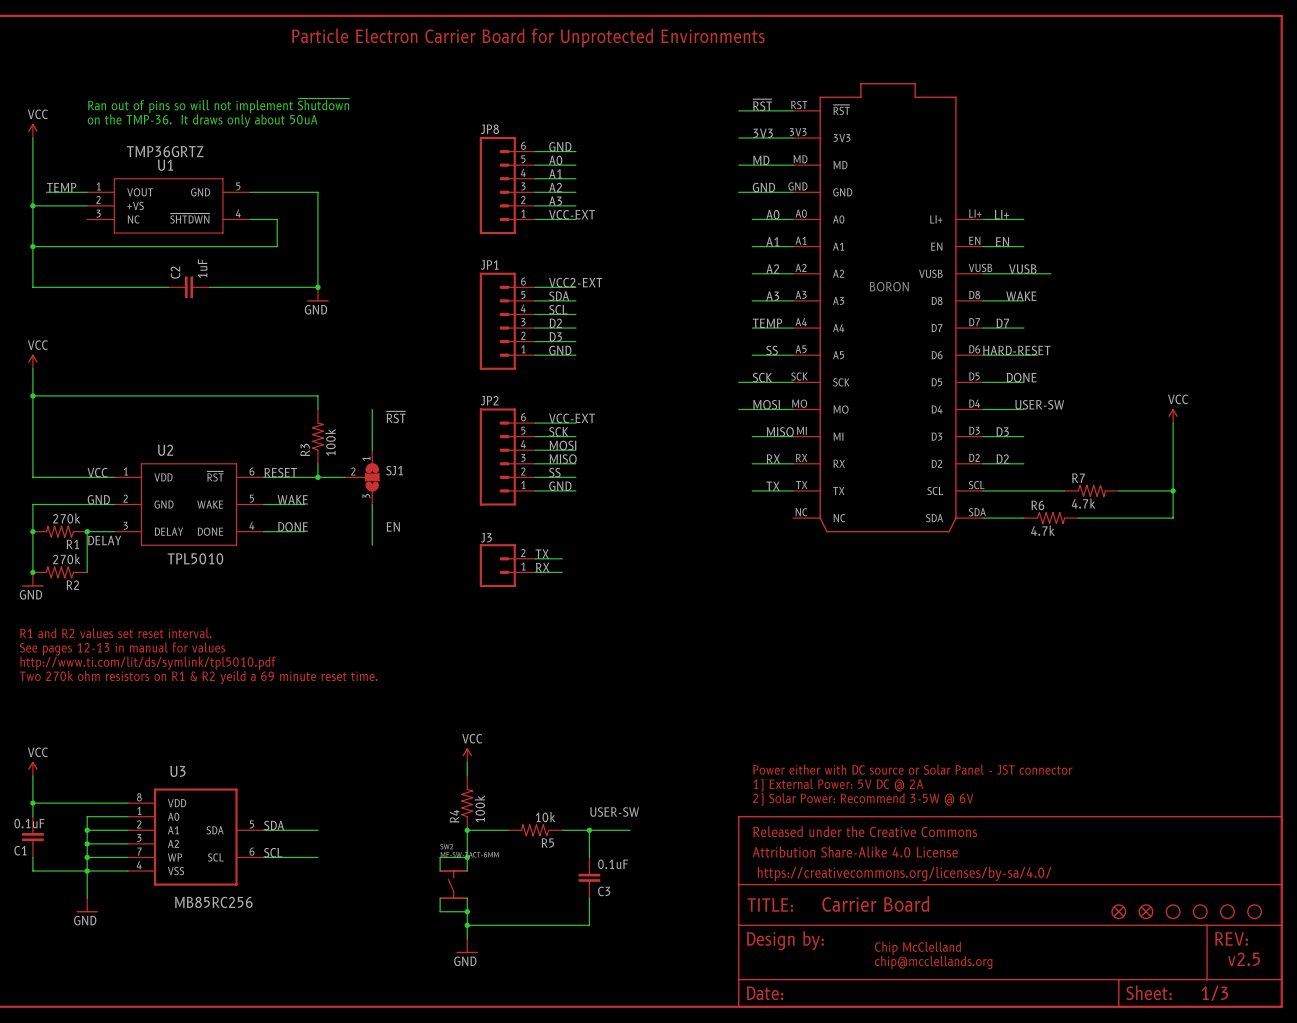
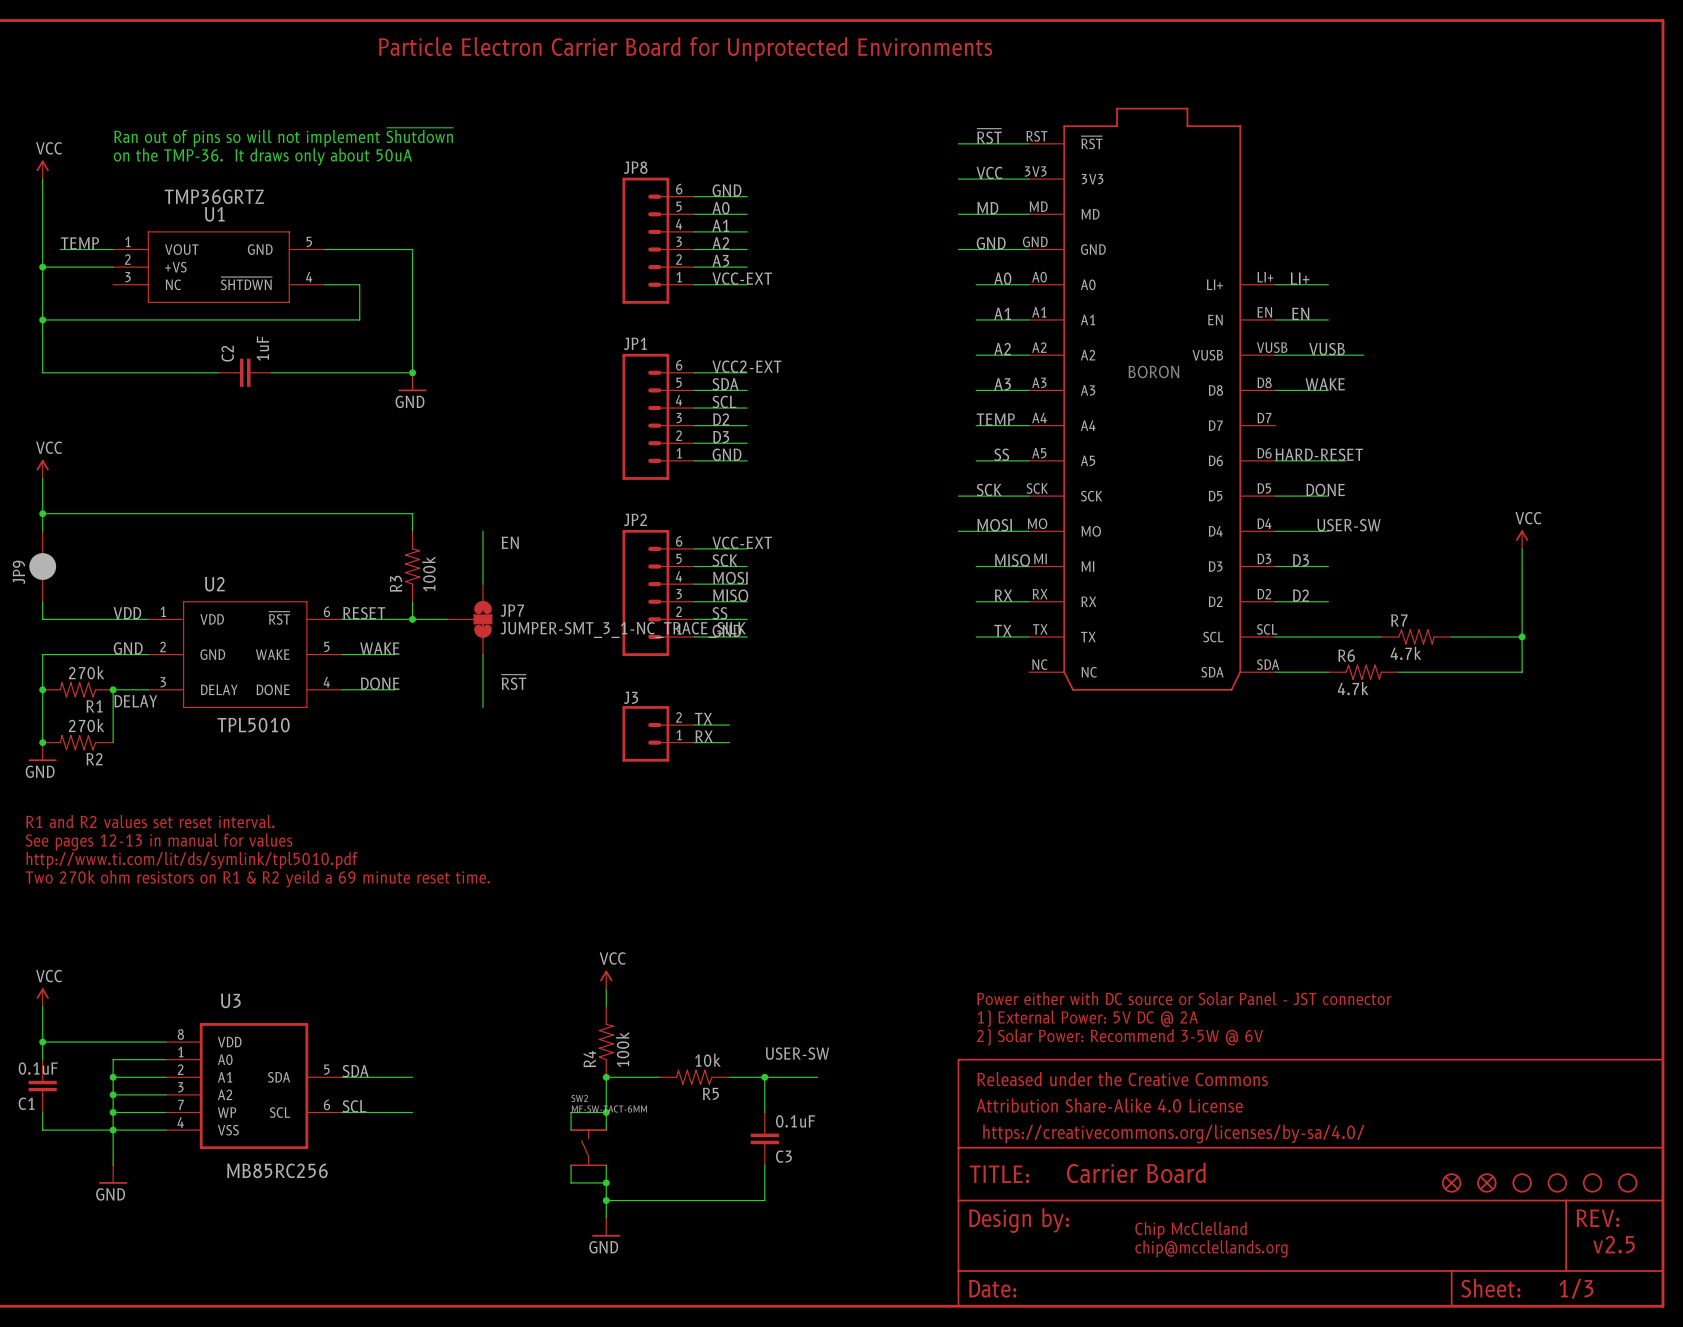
label: 3V3 (763, 133) -> VCC (989, 172)
label: D7 (1002, 323) -> none
wire: (983, 328) (1023, 328) -> none
label: ~{RST} (396, 417) -> EN (510, 542)
JP9: none -> (42, 566)
label: VCC (97, 472) -> VDD (127, 613)
SJ1: (362, 477) -> none
JP7: none -> JUMPER-SMT_3_1-NC_TRACE_SILK (470, 619)
label: EN (393, 526) -> ~{RST} (513, 682)

